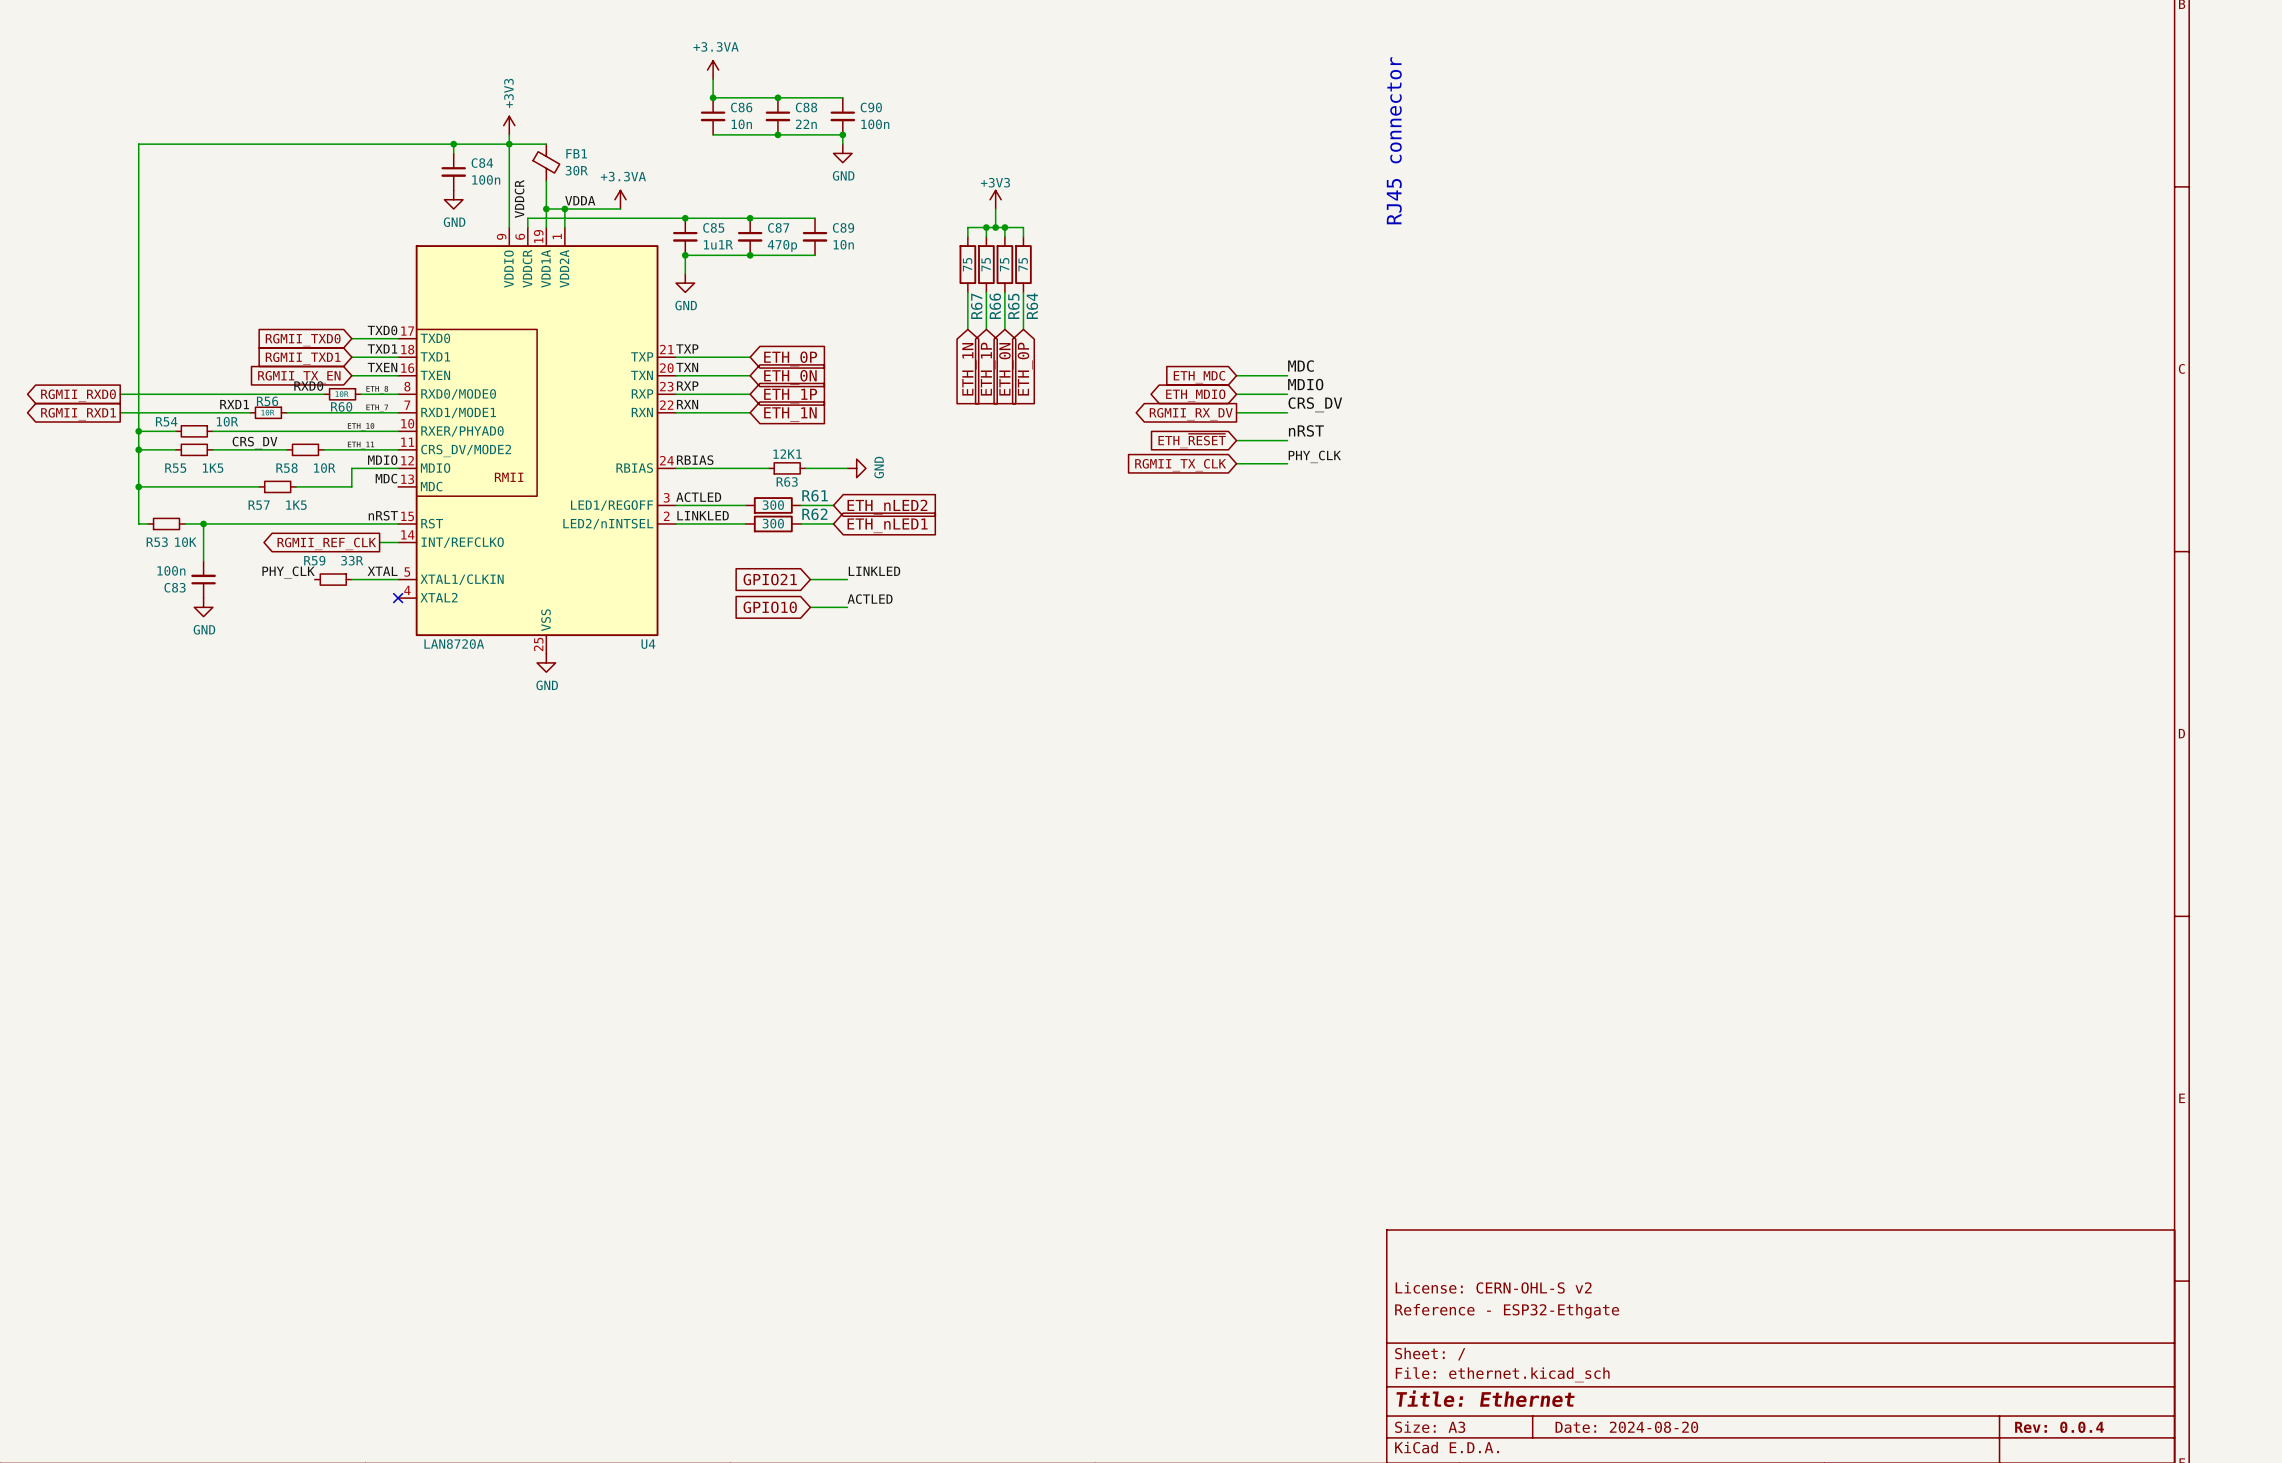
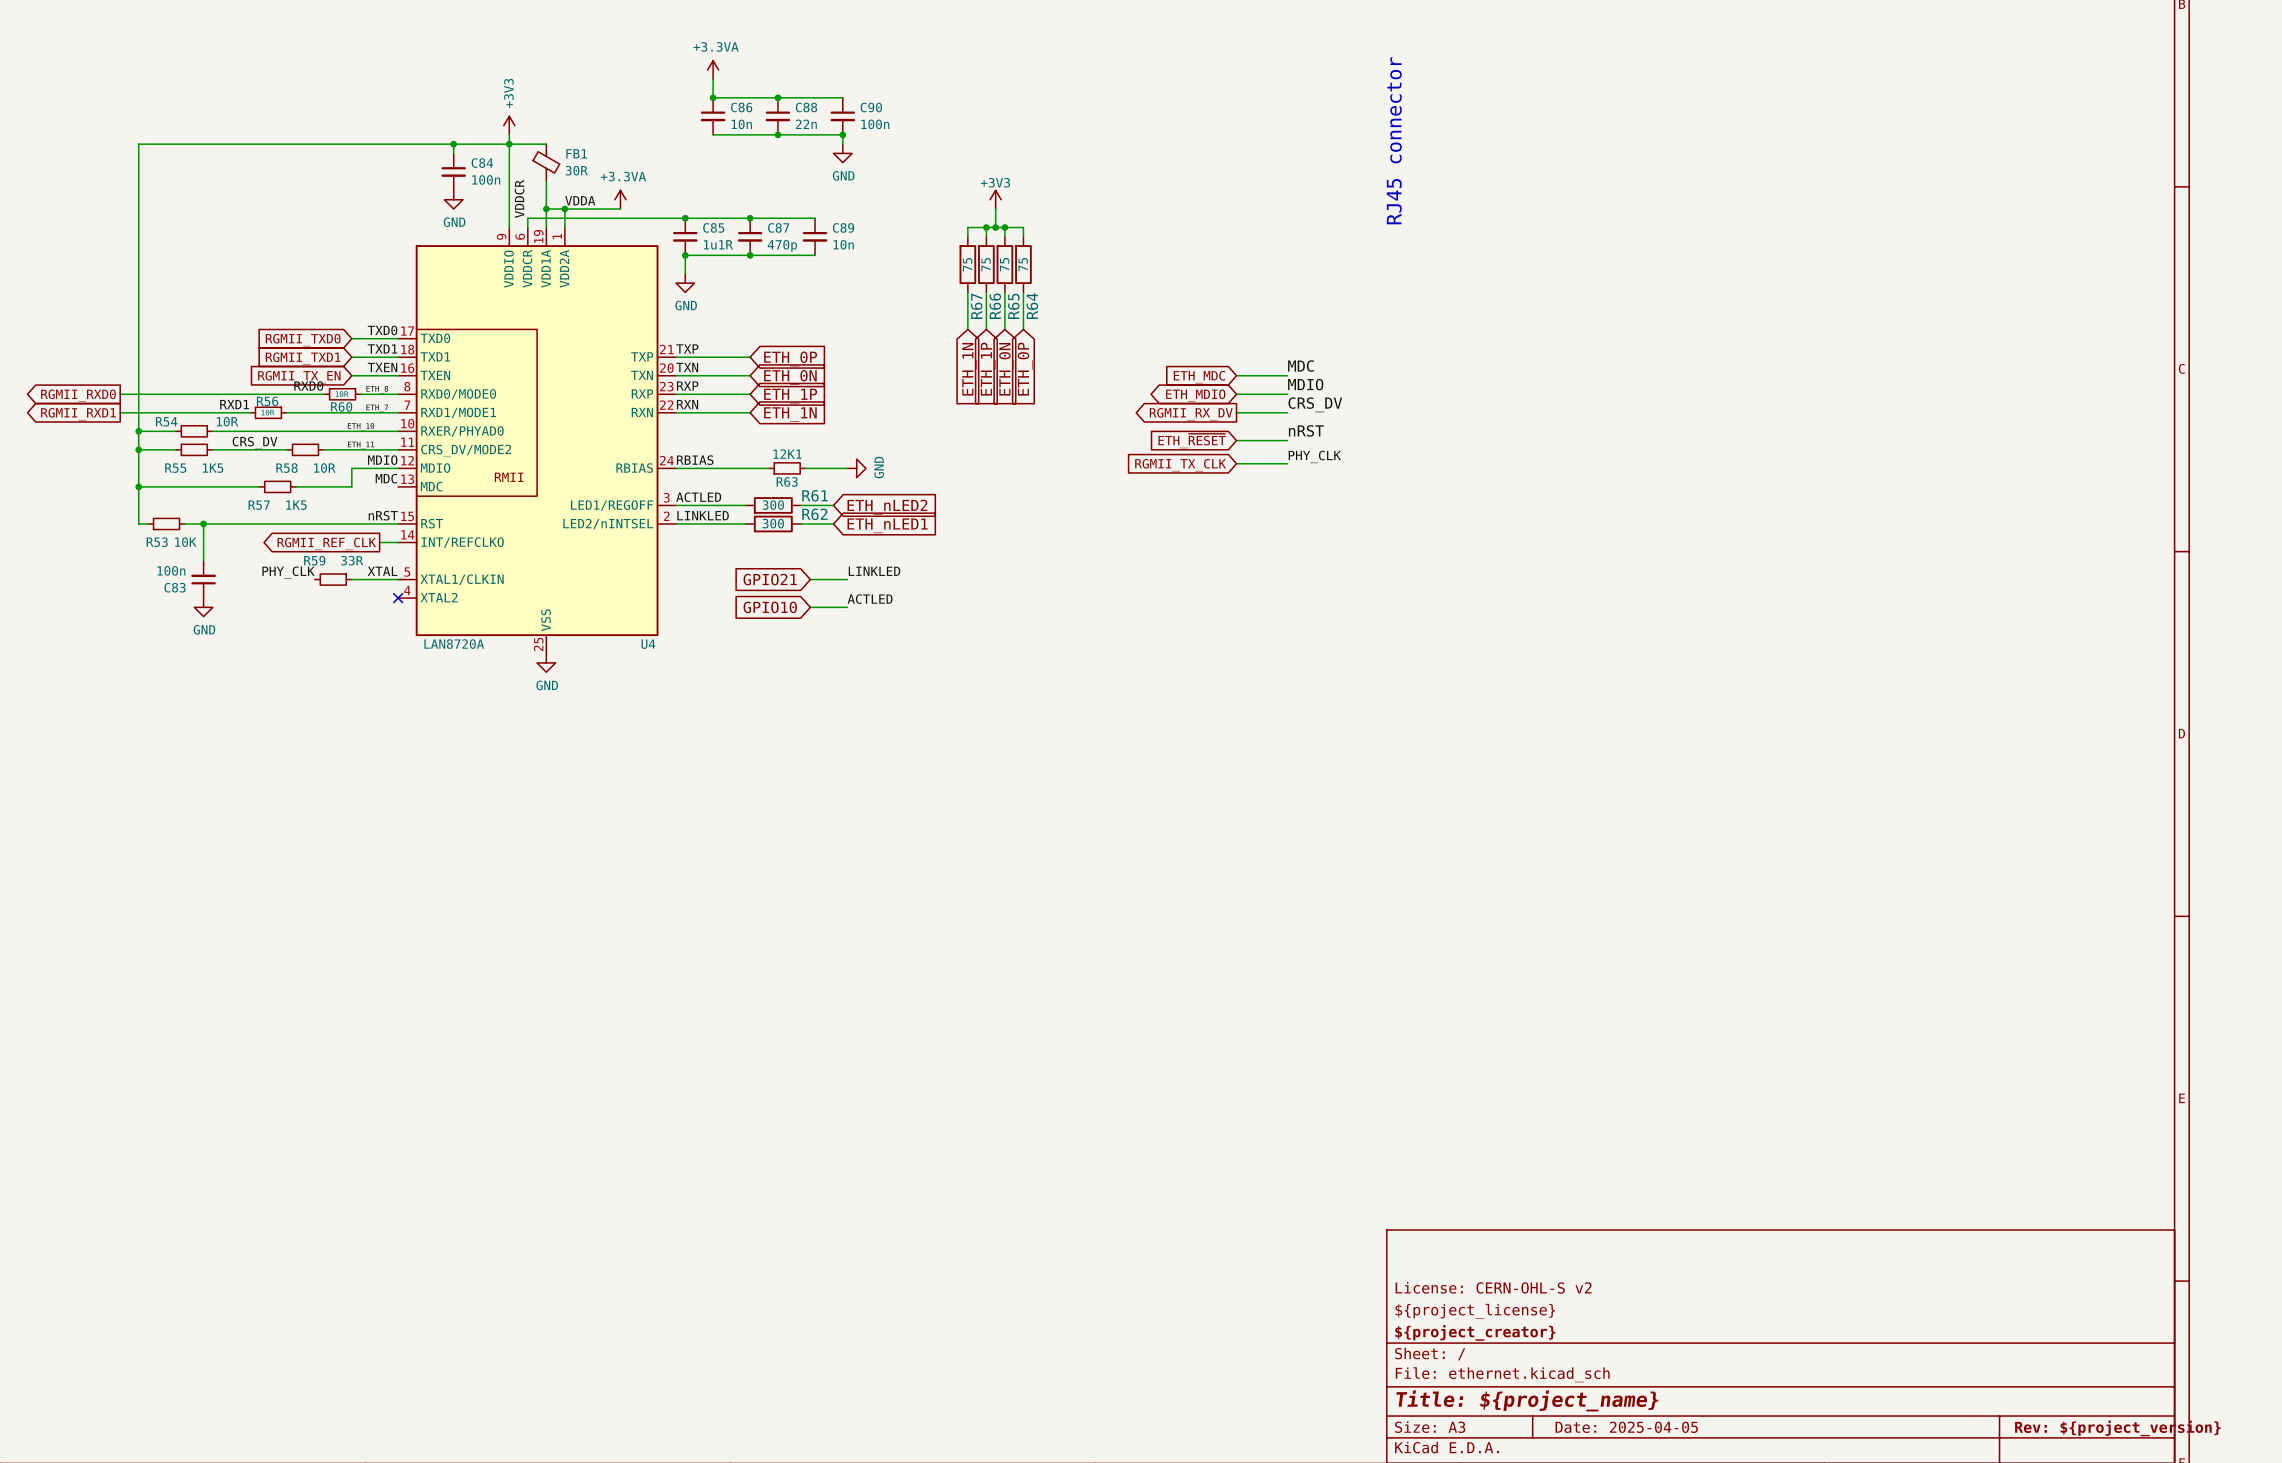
title block: Reference - ESP32-Ethgate (1507, 1311) -> ${project_license} (1475, 1311)
title block: none -> ${project_creator} (1475, 1332)
title block: Title: Ethernet (1485, 1398) -> Title: ${project_name} (1527, 1400)
title block: Date: 2024-08-20 (1626, 1427) -> Date: 2025-04-05 (1626, 1427)
title block: Rev: 0.0.4 (2059, 1427) -> Rev: ${project_version} (2117, 1428)

